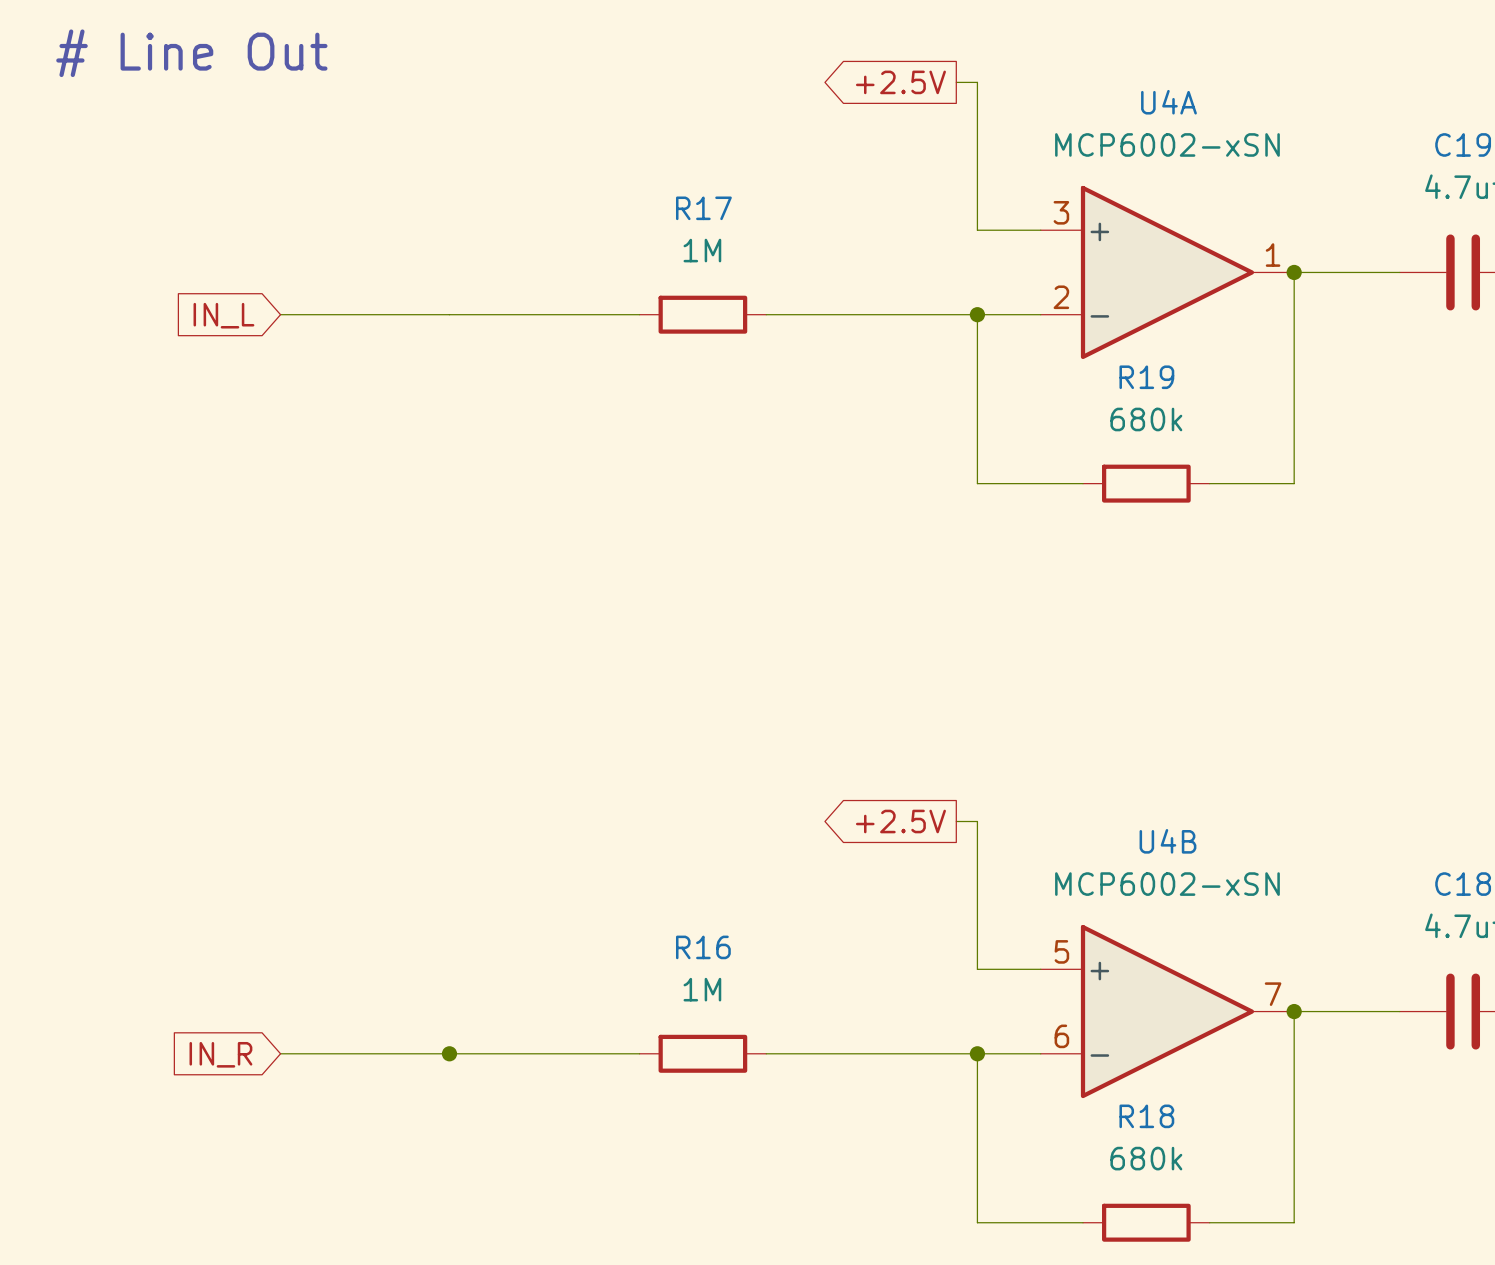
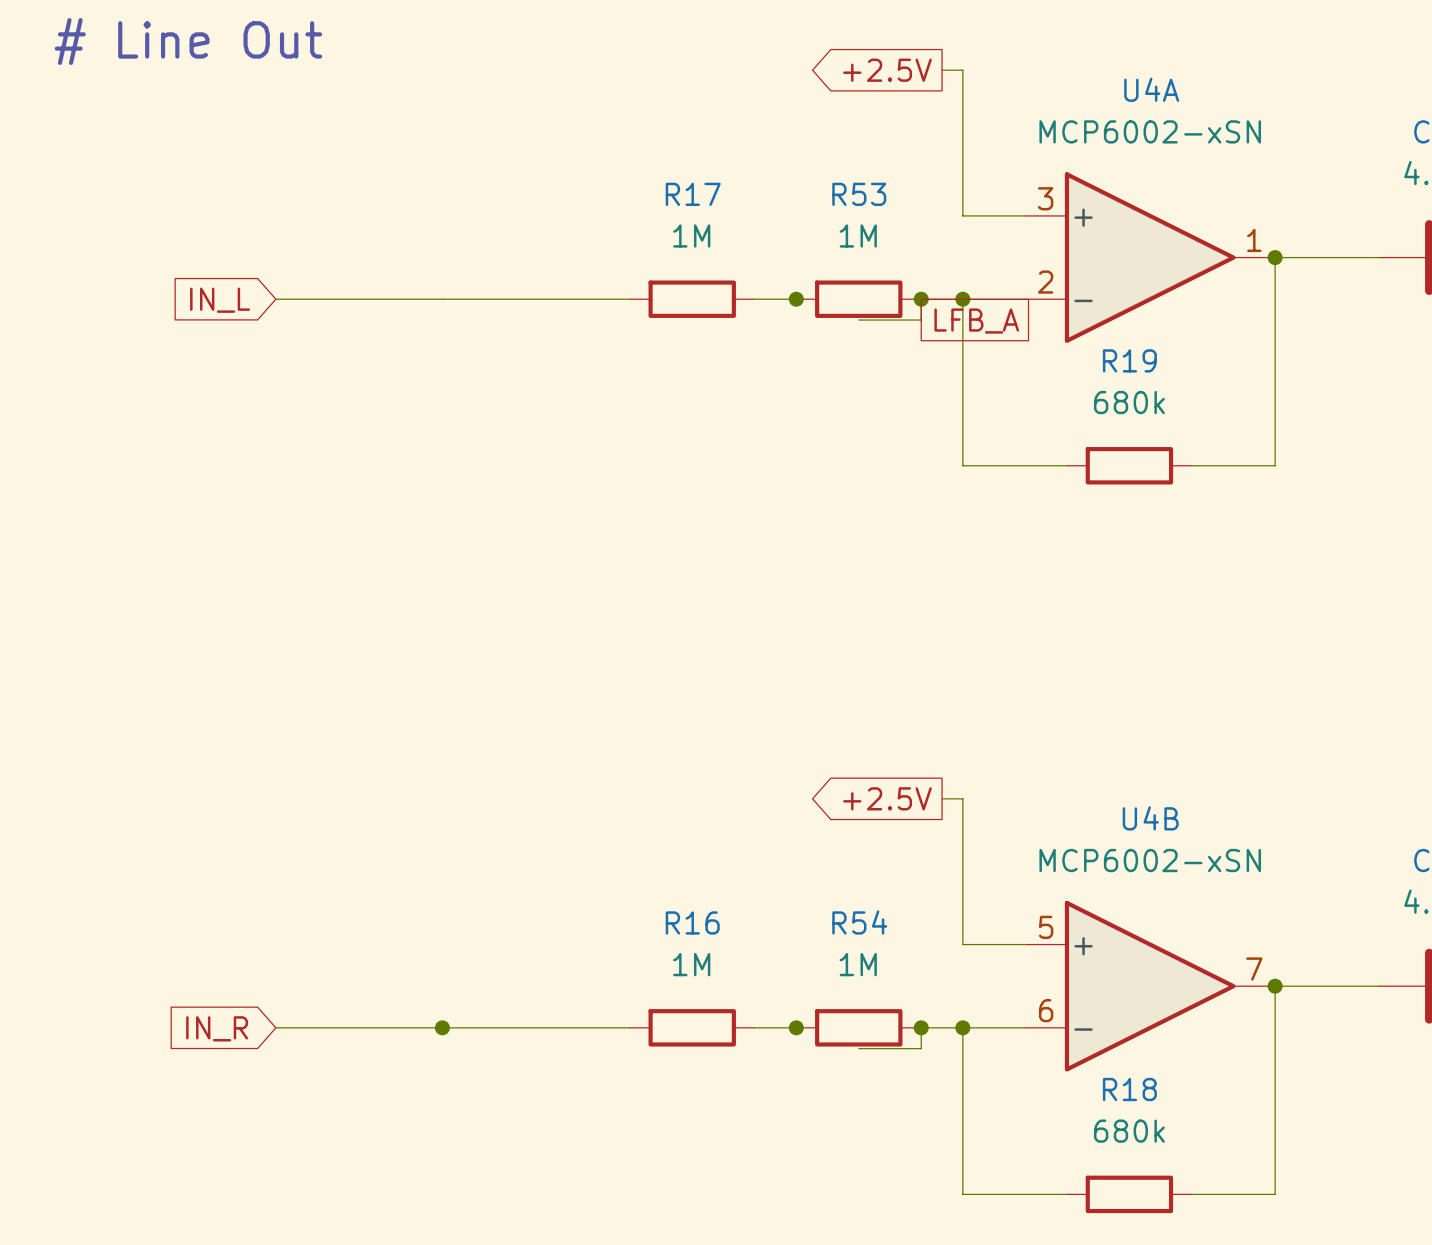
wire: (808, 314) (935, 314) -> (858, 320) (921, 320) (921, 299)
junction: none -> (796, 299)
R53: none -> 1M (858, 299)
junction: none -> (921, 299)
global label: none -> LFB_A (976, 321)
wire: (808, 1053) (935, 1053) -> (858, 1048) (921, 1048) (921, 1027)
junction: none -> (796, 1027)
R54: none -> 1M (858, 1027)
junction: none -> (921, 1027)

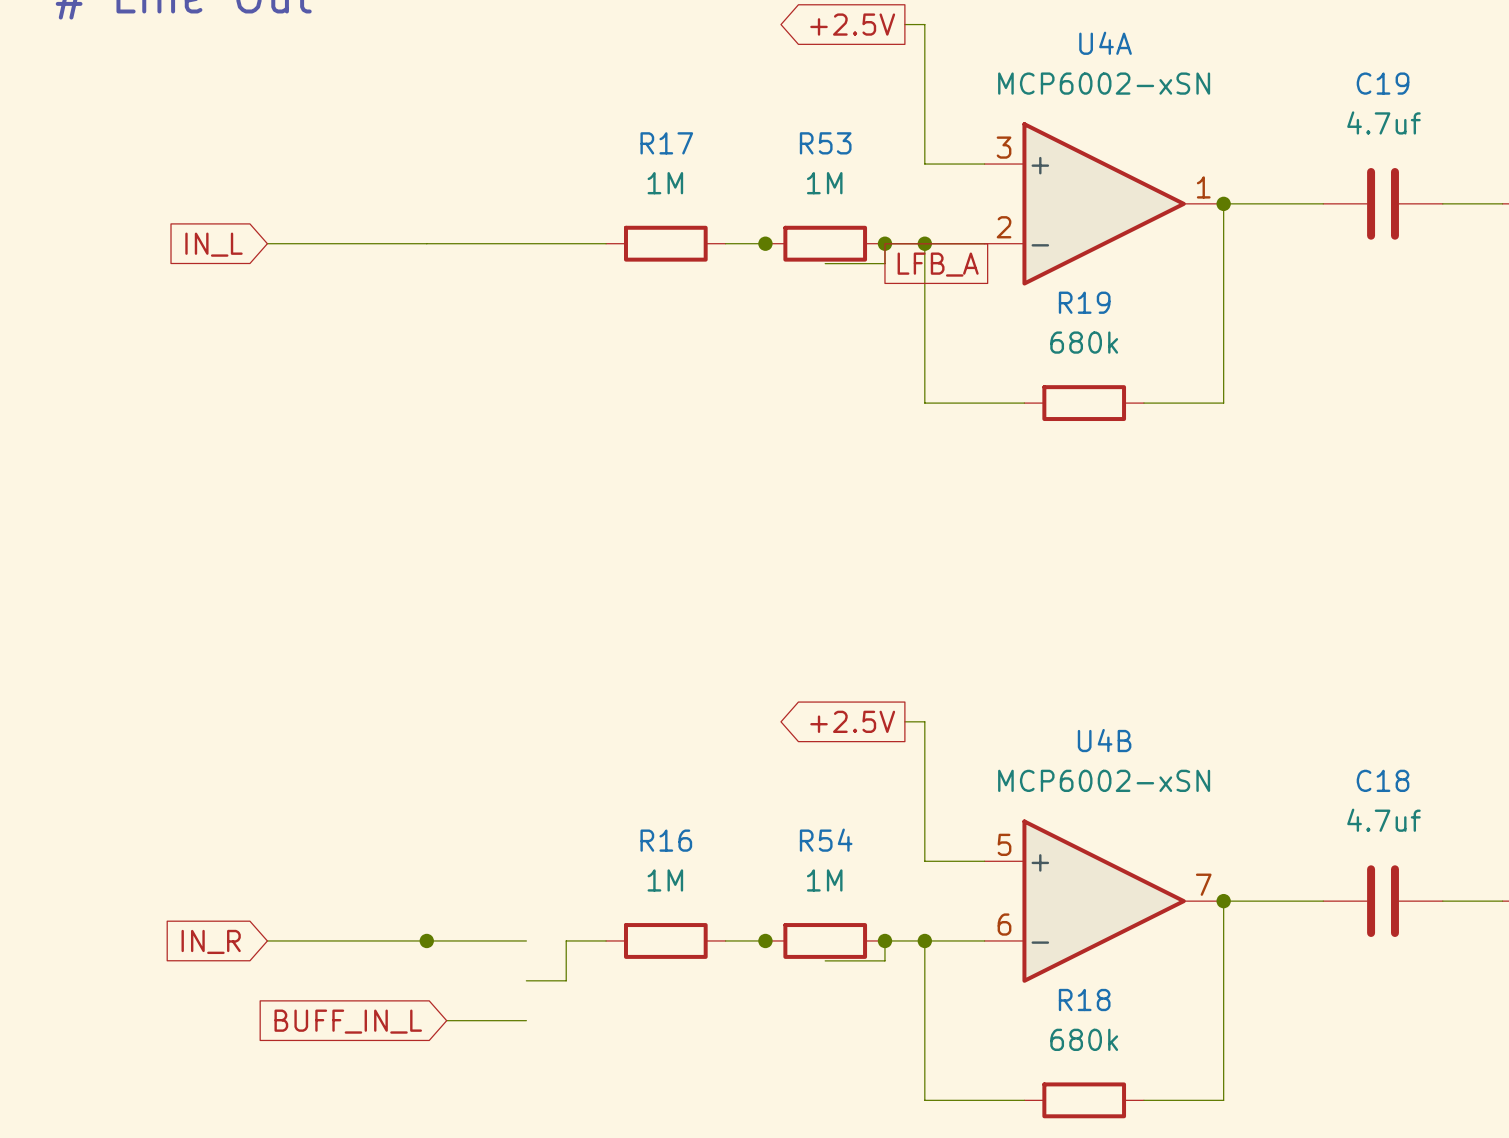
wire: (546, 1027) (588, 1027) -> (526, 980) (566, 980) (566, 940)
wire: none -> (446, 1020) (526, 1020)
global label: none -> BUFF_IN_L (348, 1021)

